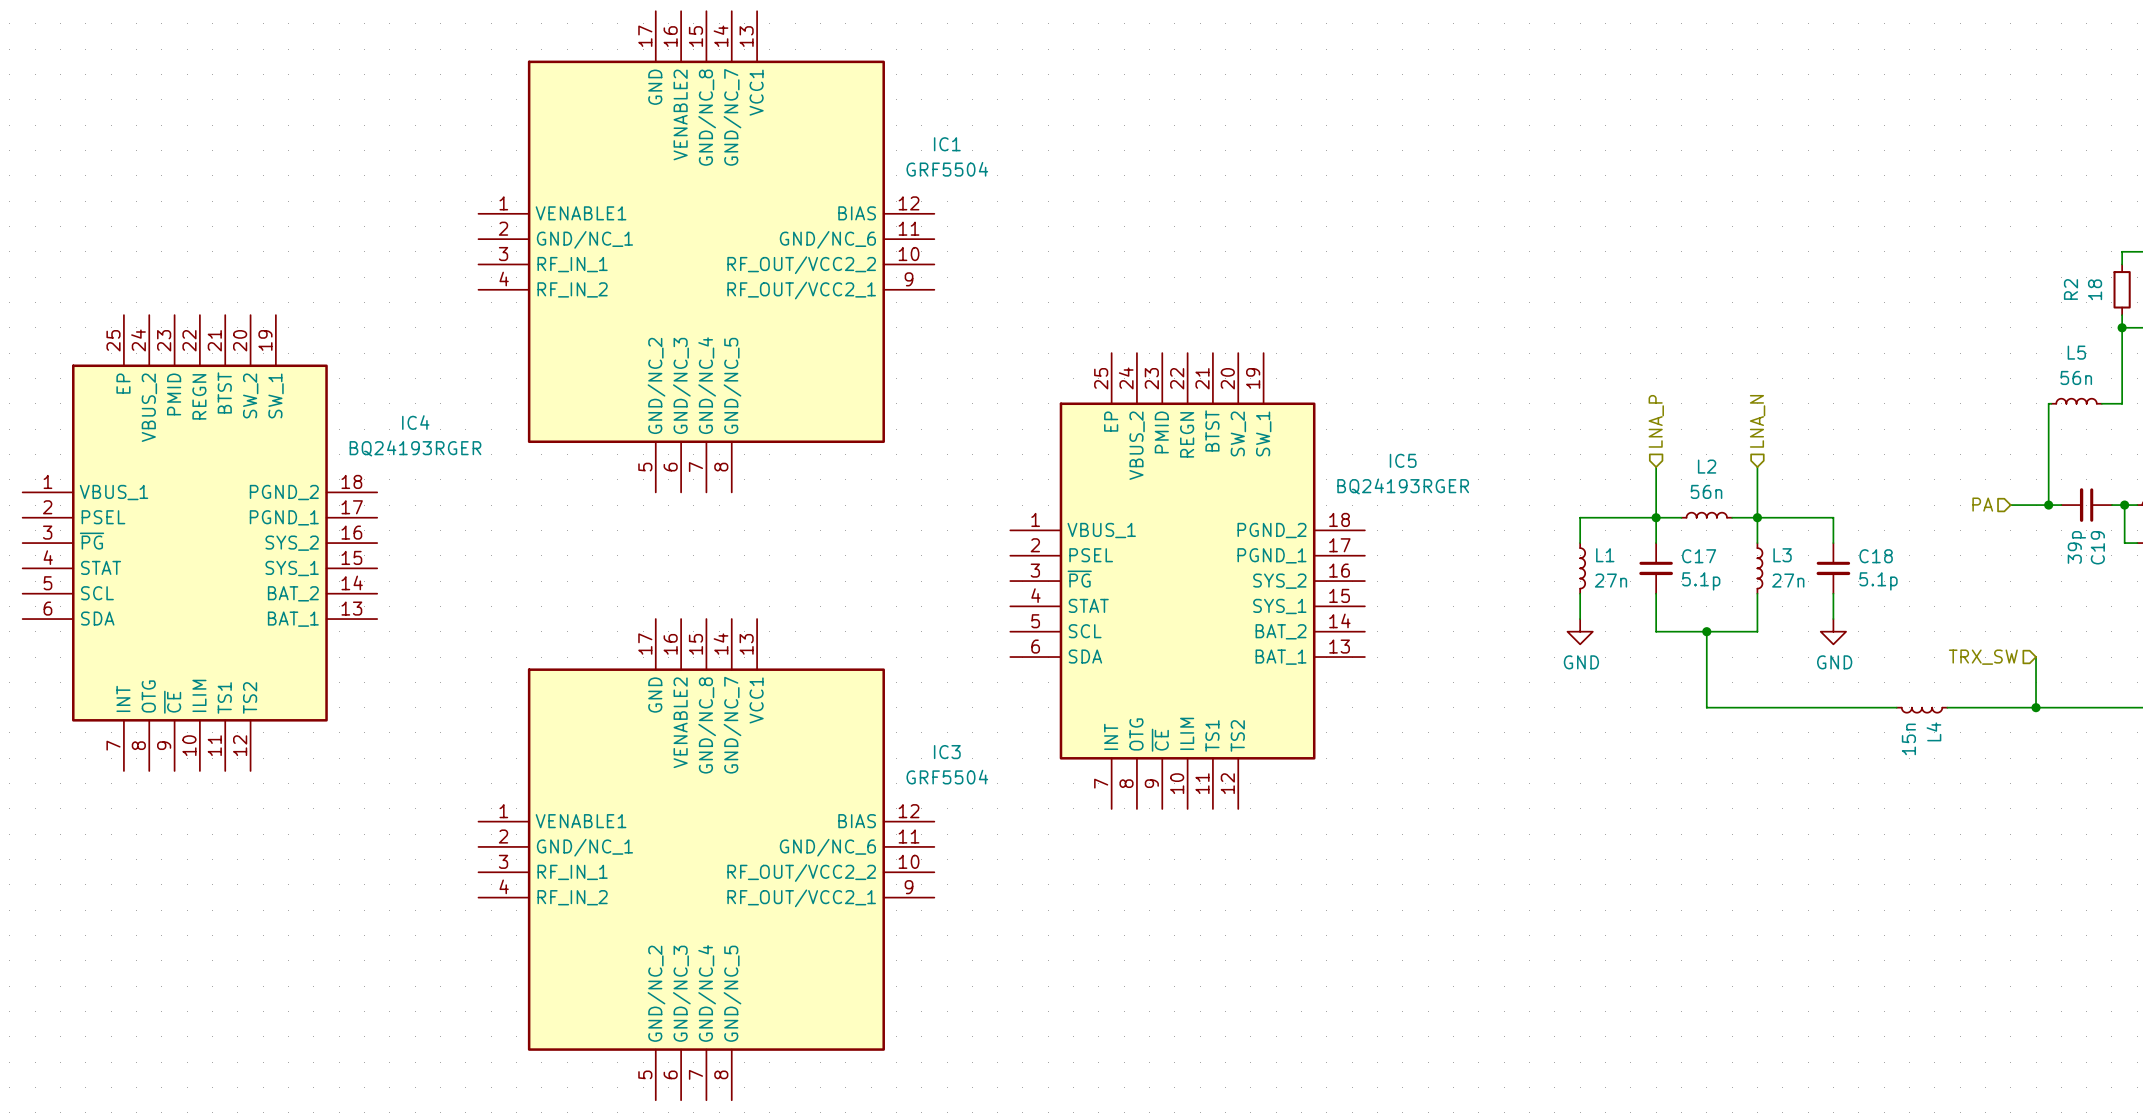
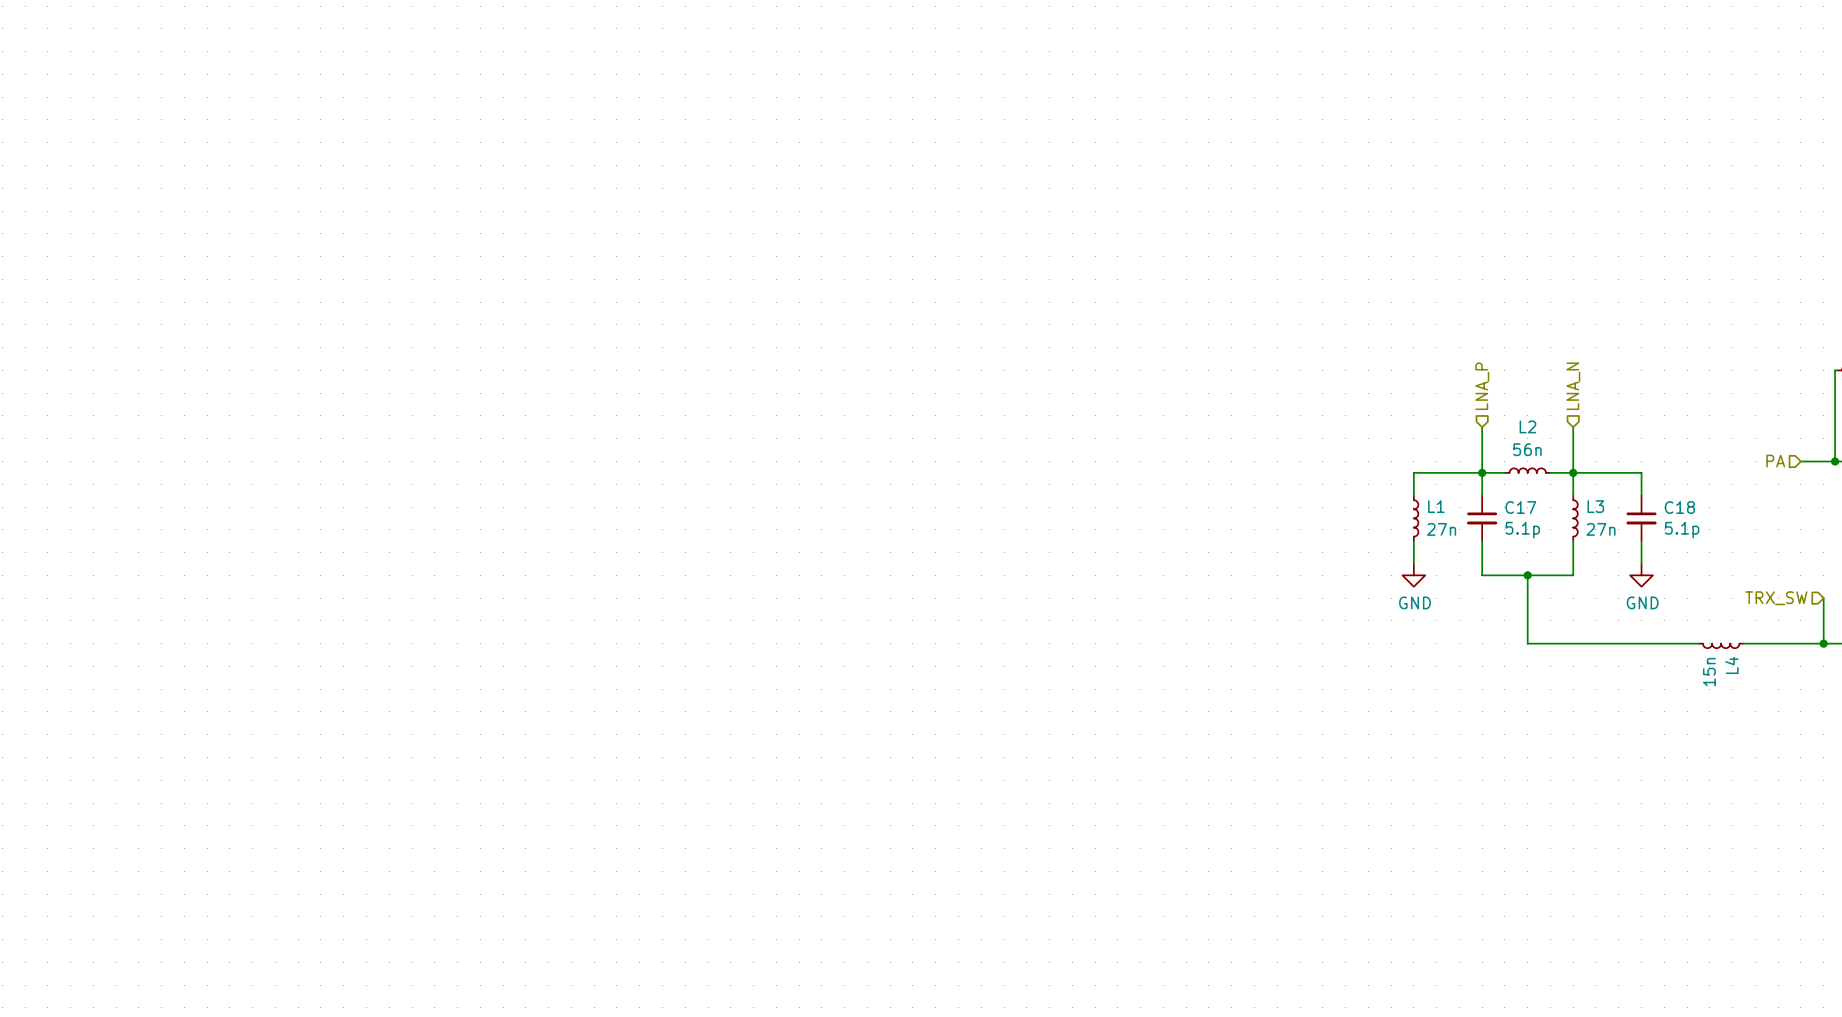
IC1: GRF5504 (706, 251) -> none
IC4: BQ24193RGER (199, 543) -> none
IC5: BQ24193RGER (1187, 581) -> none
IC3: GRF5504 (706, 859) -> none

